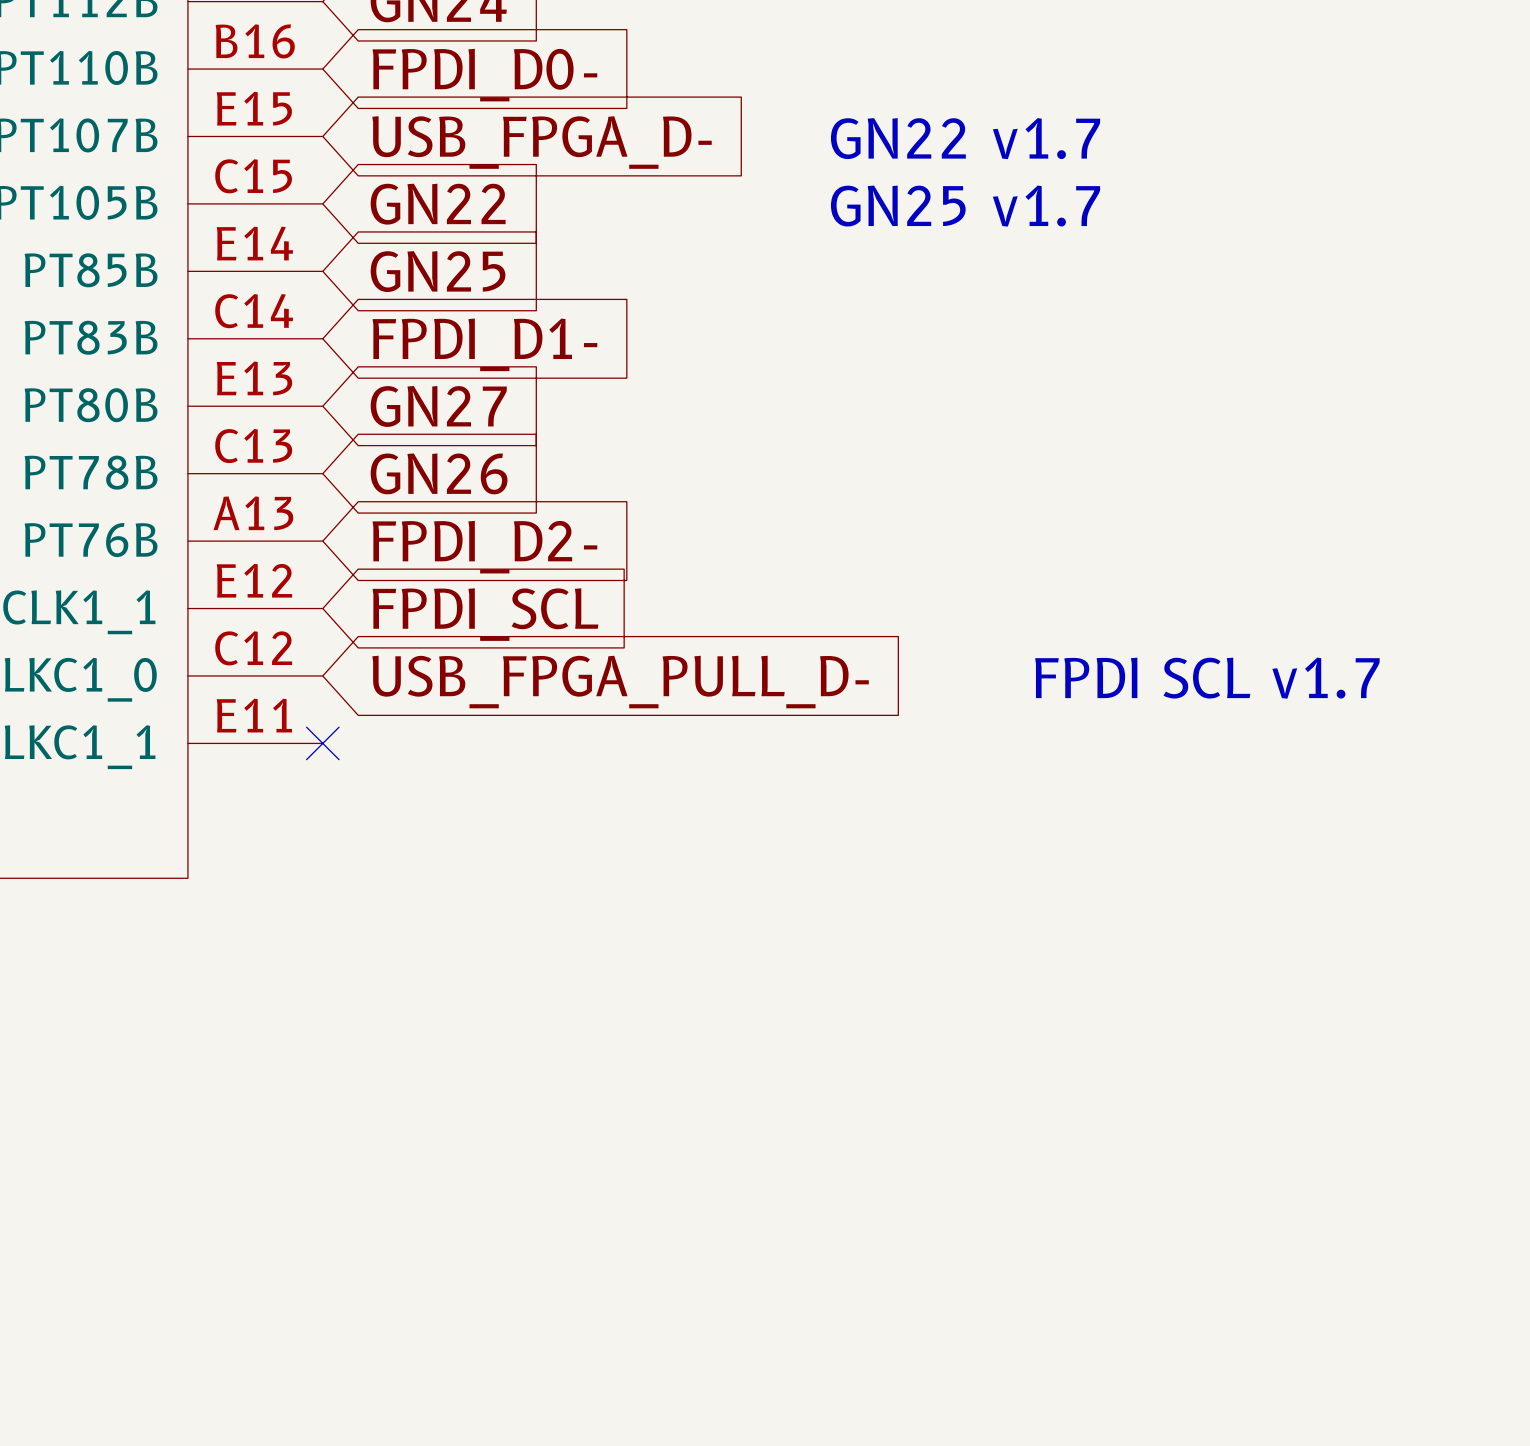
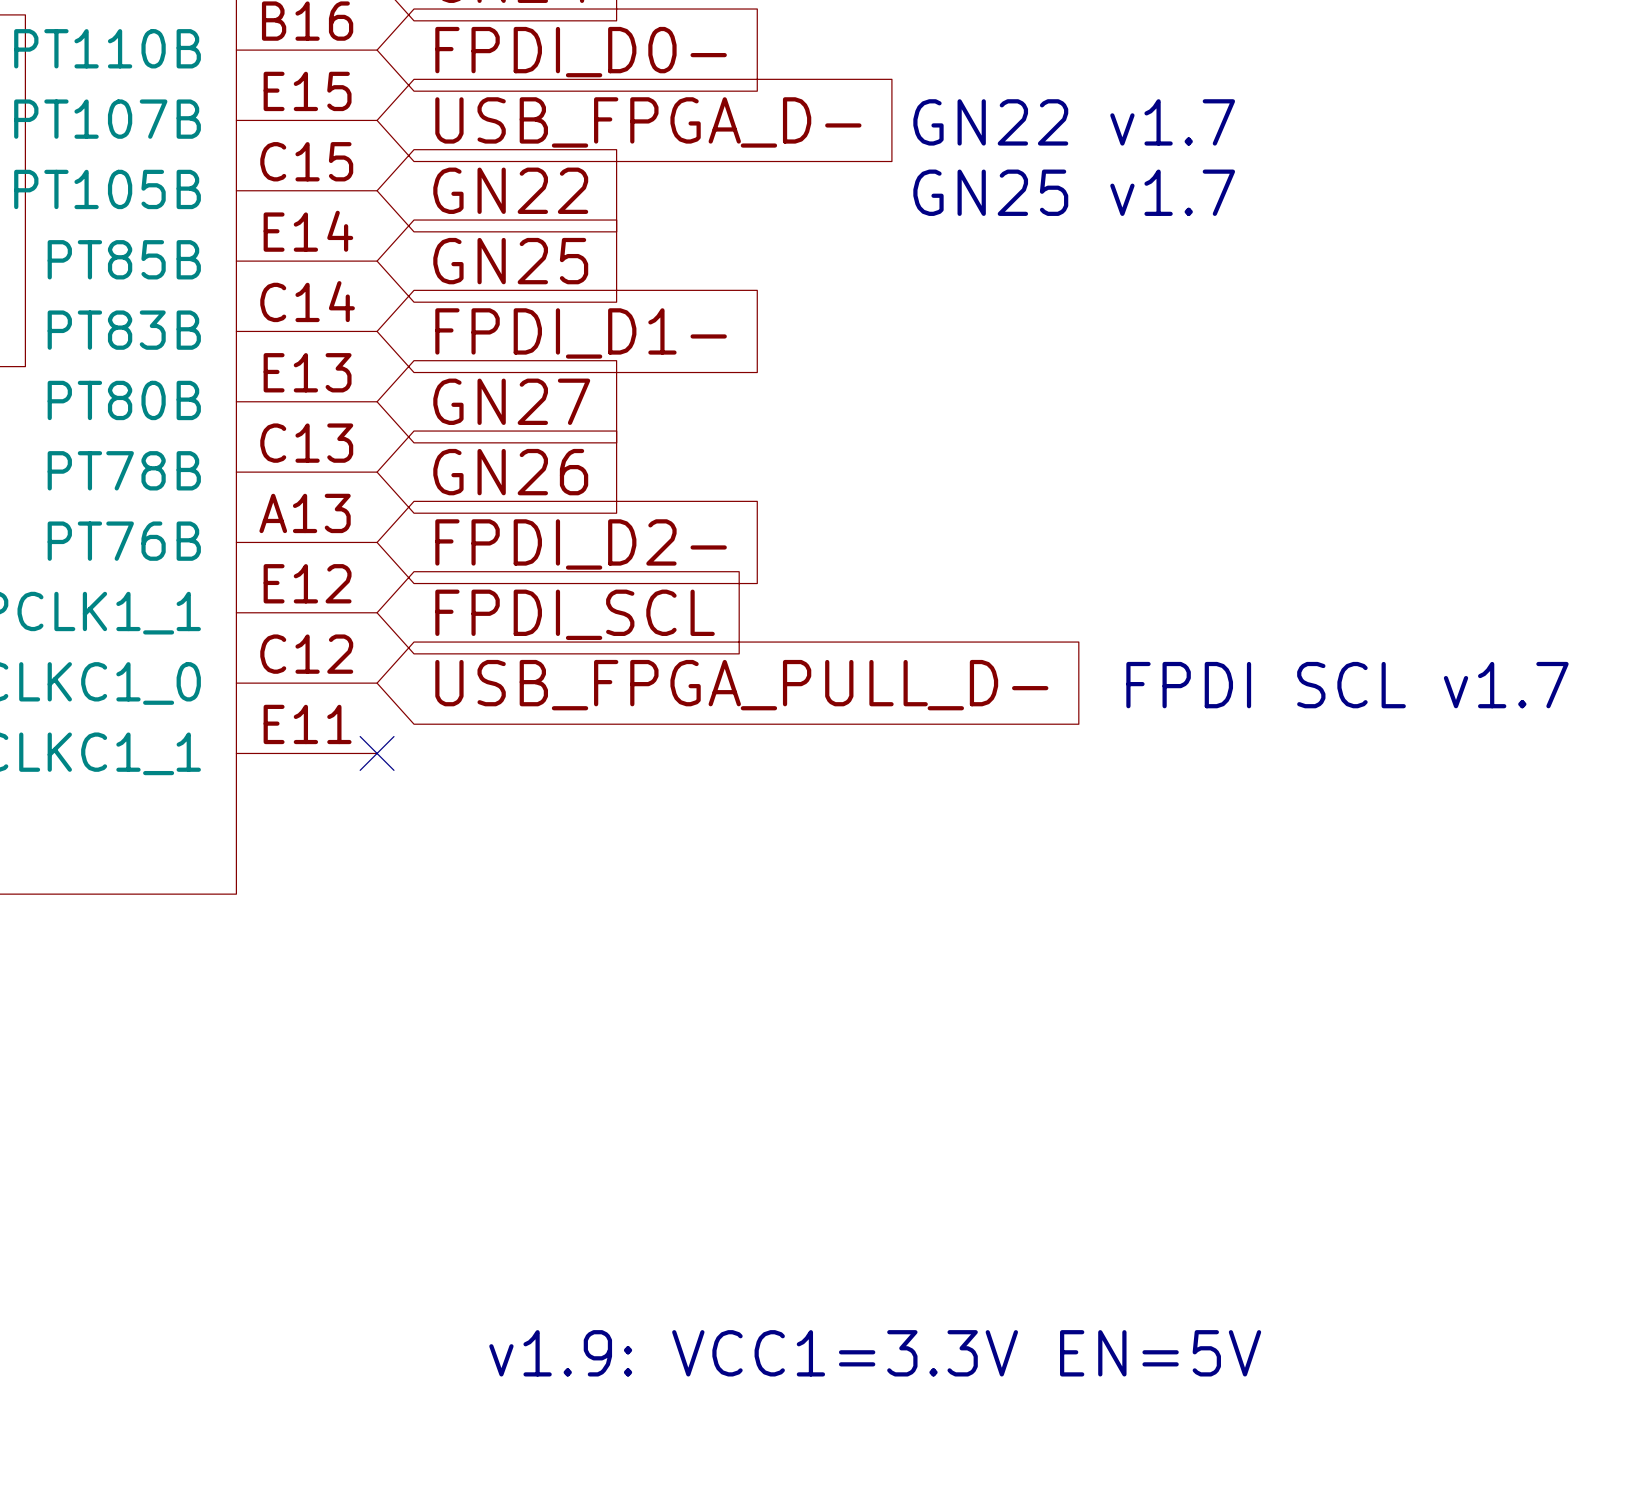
text: none -> v1.9: VCC1=3.3V EN=5V (875, 1353)

